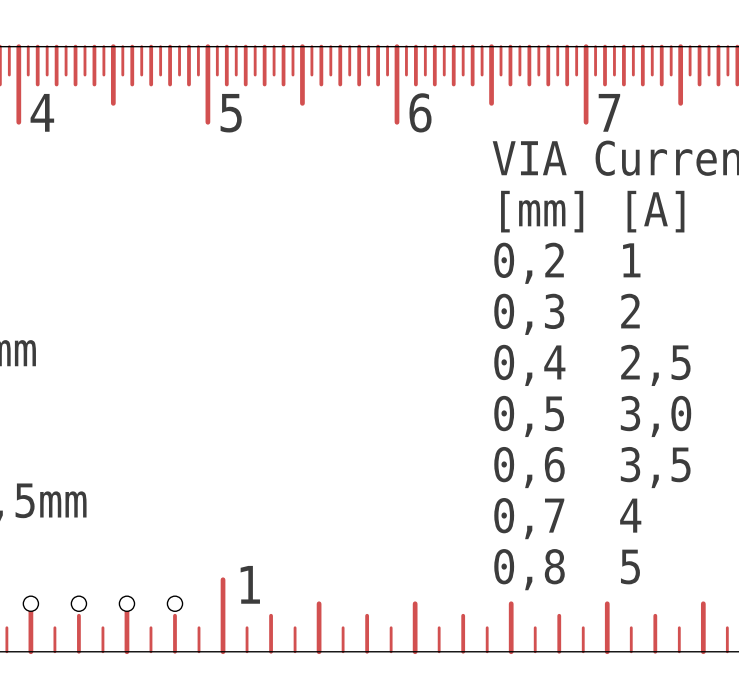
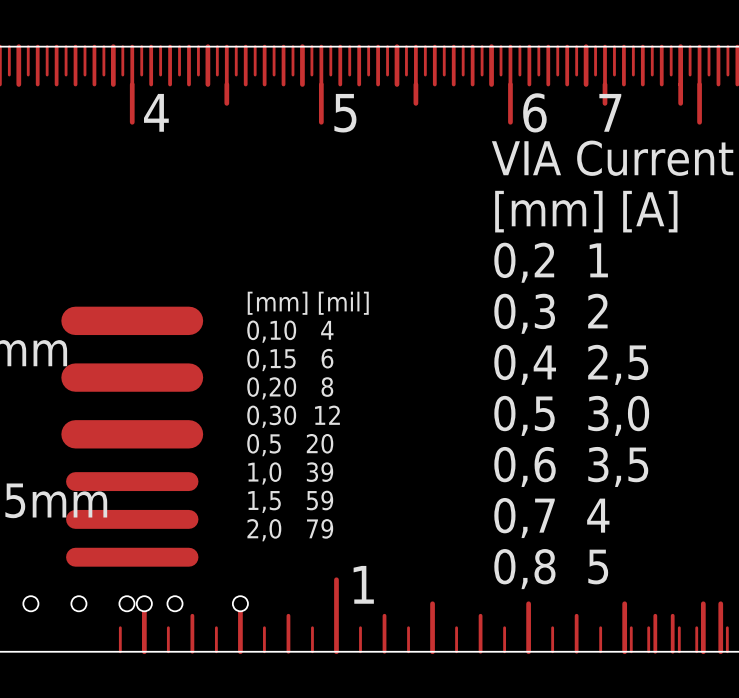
top track: (18, 84) (18, 122) -> (132, 84) (132, 122)
top track: (113, 84) (113, 103) -> (226, 84) (226, 103)
top track: (207, 84) (207, 122) -> (321, 84) (321, 122)
top track: (302, 84) (302, 103) -> (415, 84) (415, 103)
top track: (396, 84) (396, 122) -> (510, 84) (510, 122)
top track: (491, 84) (491, 103) -> (605, 84) (605, 103)
top track: (586, 84) (586, 122) -> (699, 84) (699, 122)
text position: 4 (42, 112) -> 4 (156, 112)
text position: 6 (420, 112) -> 6 (534, 112)
text position: 5 (231, 113) -> 5 (345, 113)
text: none -> [mm] [mil] (308, 303)
top track: none -> (75, 320) (188, 320)
text: none -> 0,10 4 (290, 331)
text: none -> 0,15 6 (290, 360)
top track: none -> (75, 377) (188, 377)
text: none -> 0,20 8 (290, 388)
text: none -> 0,30 12 (293, 416)
top track: none -> (75, 434) (188, 434)
text: none -> 0,5 20 (290, 445)
text: none -> 1,0 39 (290, 473)
top track: none -> (75, 481) (188, 481)
text: none -> 1,5 59 (290, 501)
top track: none -> (75, 519) (188, 519)
text: none -> 2,0 79 (290, 530)
top track: none -> (75, 557) (188, 557)
top track: (223, 579) (223, 651) -> (336, 579) (336, 651)
text position: 1 (250, 584) -> 1 (363, 584)
top track: (30, 603) (30, 651) -> (144, 603) (144, 651)
top track: (126, 603) (126, 651) -> (240, 603) (240, 651)
hole: none -> (144, 603)
hole: none -> (240, 603)
top track: (319, 603) (319, 651) -> (432, 603) (432, 651)
top track: (415, 603) (415, 651) -> (528, 603) (528, 651)
top track: (511, 603) (511, 651) -> (624, 603) (624, 651)
top track: (607, 603) (607, 651) -> (720, 603) (720, 651)
top track: (78, 615) (78, 651) -> (192, 615) (192, 651)
top track: (174, 615) (174, 651) -> (288, 615) (288, 651)
top track: (271, 615) (271, 651) -> (384, 615) (384, 651)
top track: (367, 615) (367, 651) -> (480, 615) (480, 651)
top track: (463, 615) (463, 651) -> (576, 615) (576, 651)
top track: (559, 615) (559, 651) -> (672, 615) (672, 651)
top track: (6, 627) (6, 651) -> (120, 627) (120, 651)
top track: (54, 627) (54, 651) -> (168, 627) (168, 651)
top track: (102, 627) (102, 651) -> (216, 627) (216, 651)
top track: (150, 627) (150, 651) -> (264, 627) (264, 651)
top track: (199, 627) (199, 651) -> (312, 627) (312, 651)
top track: (247, 627) (247, 651) -> (360, 627) (360, 651)
top track: (295, 627) (295, 651) -> (408, 627) (408, 651)
top track: (343, 627) (343, 651) -> (456, 627) (456, 651)
top track: (391, 627) (391, 651) -> (504, 627) (504, 651)
top track: (439, 627) (439, 651) -> (552, 627) (552, 651)
top track: (487, 627) (487, 651) -> (600, 627) (600, 651)
top track: (535, 627) (535, 651) -> (648, 627) (648, 651)
top track: (583, 627) (583, 651) -> (696, 627) (696, 651)

